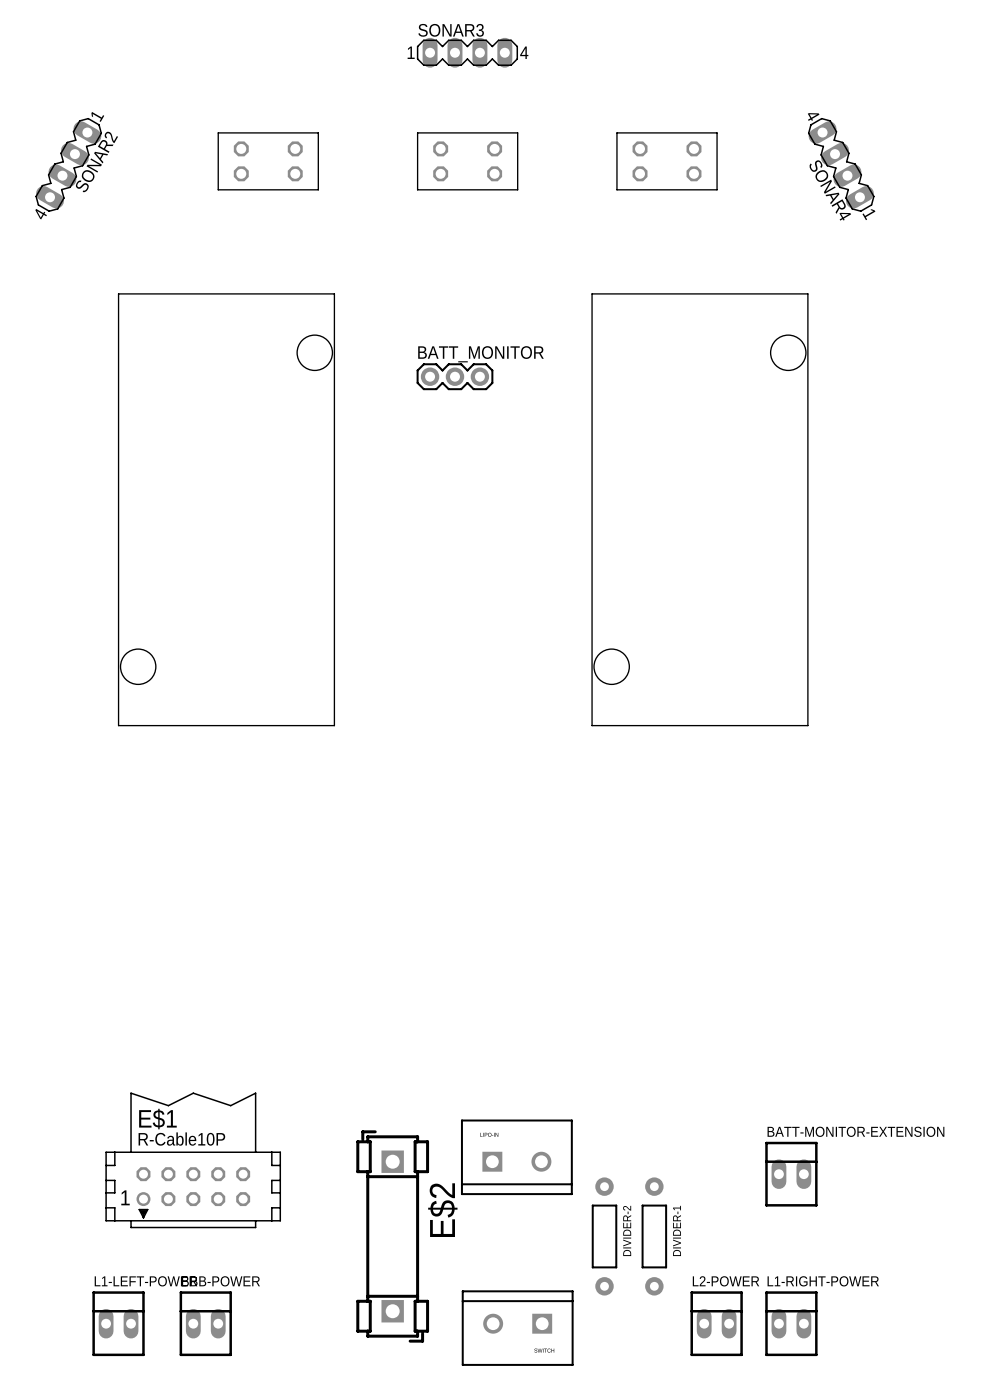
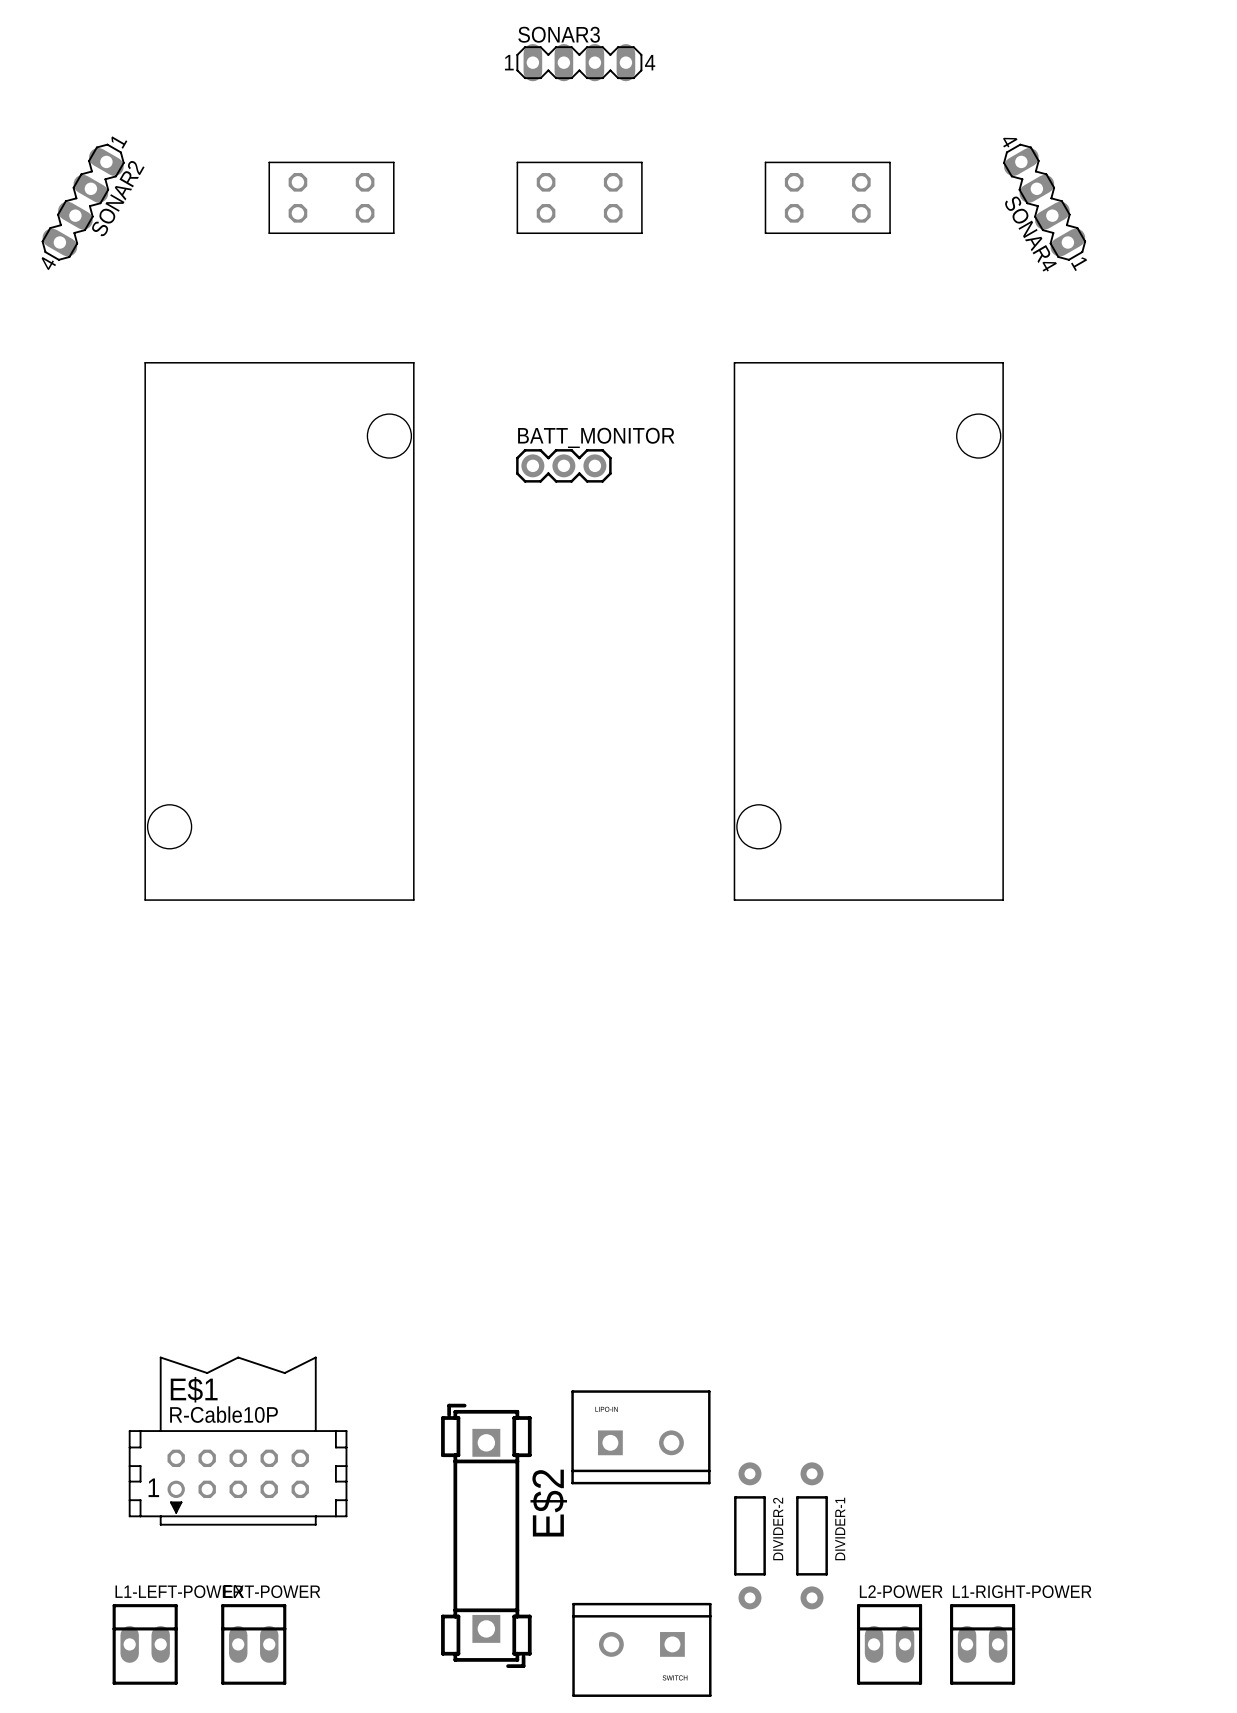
BATT-MONITOR-EXTENSION: (791, 1174) -> none
BBB-POWER name: BBB-POWER (220, 1281) -> EXT-POWER (272, 1591)

